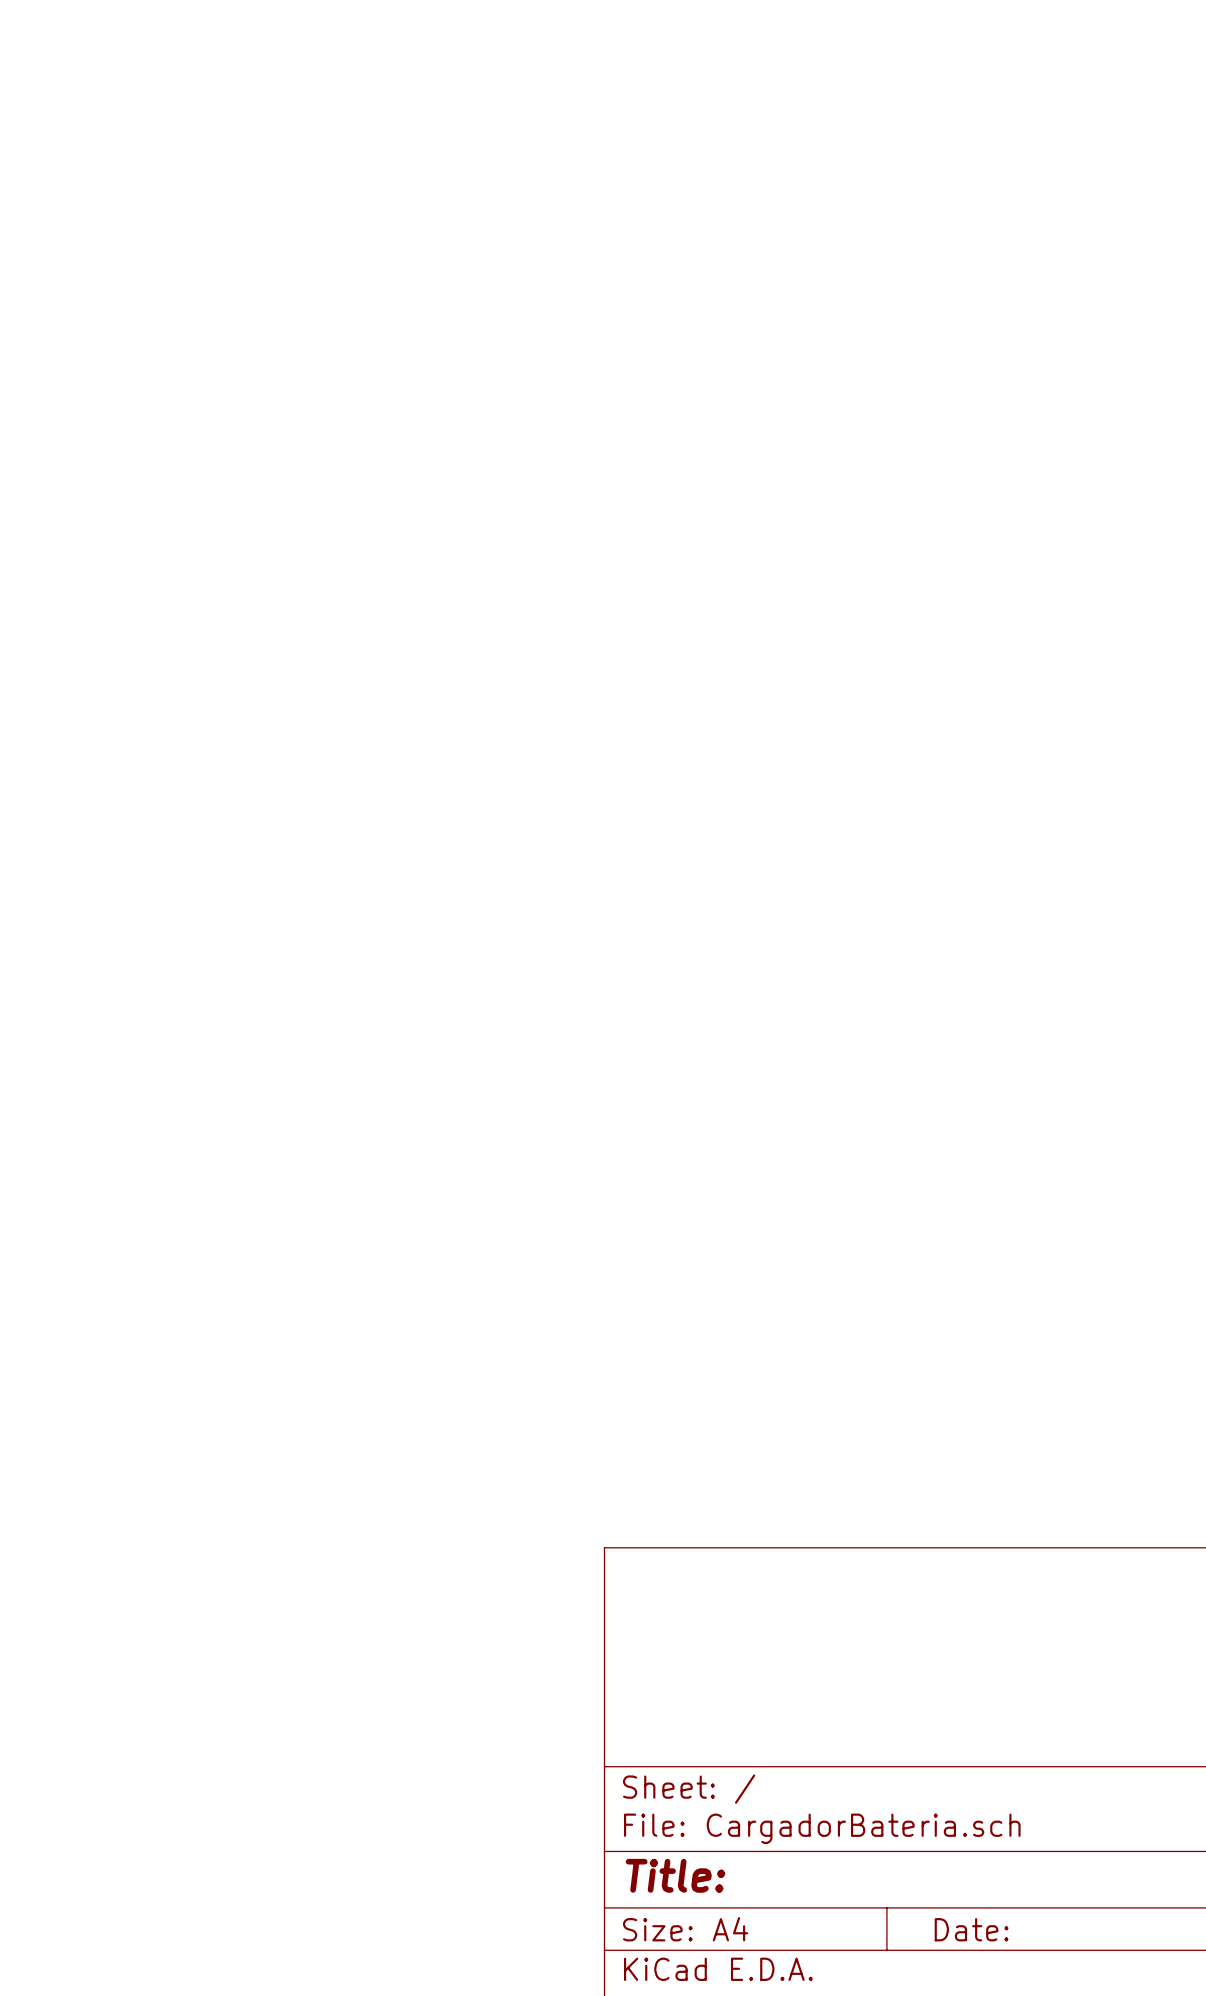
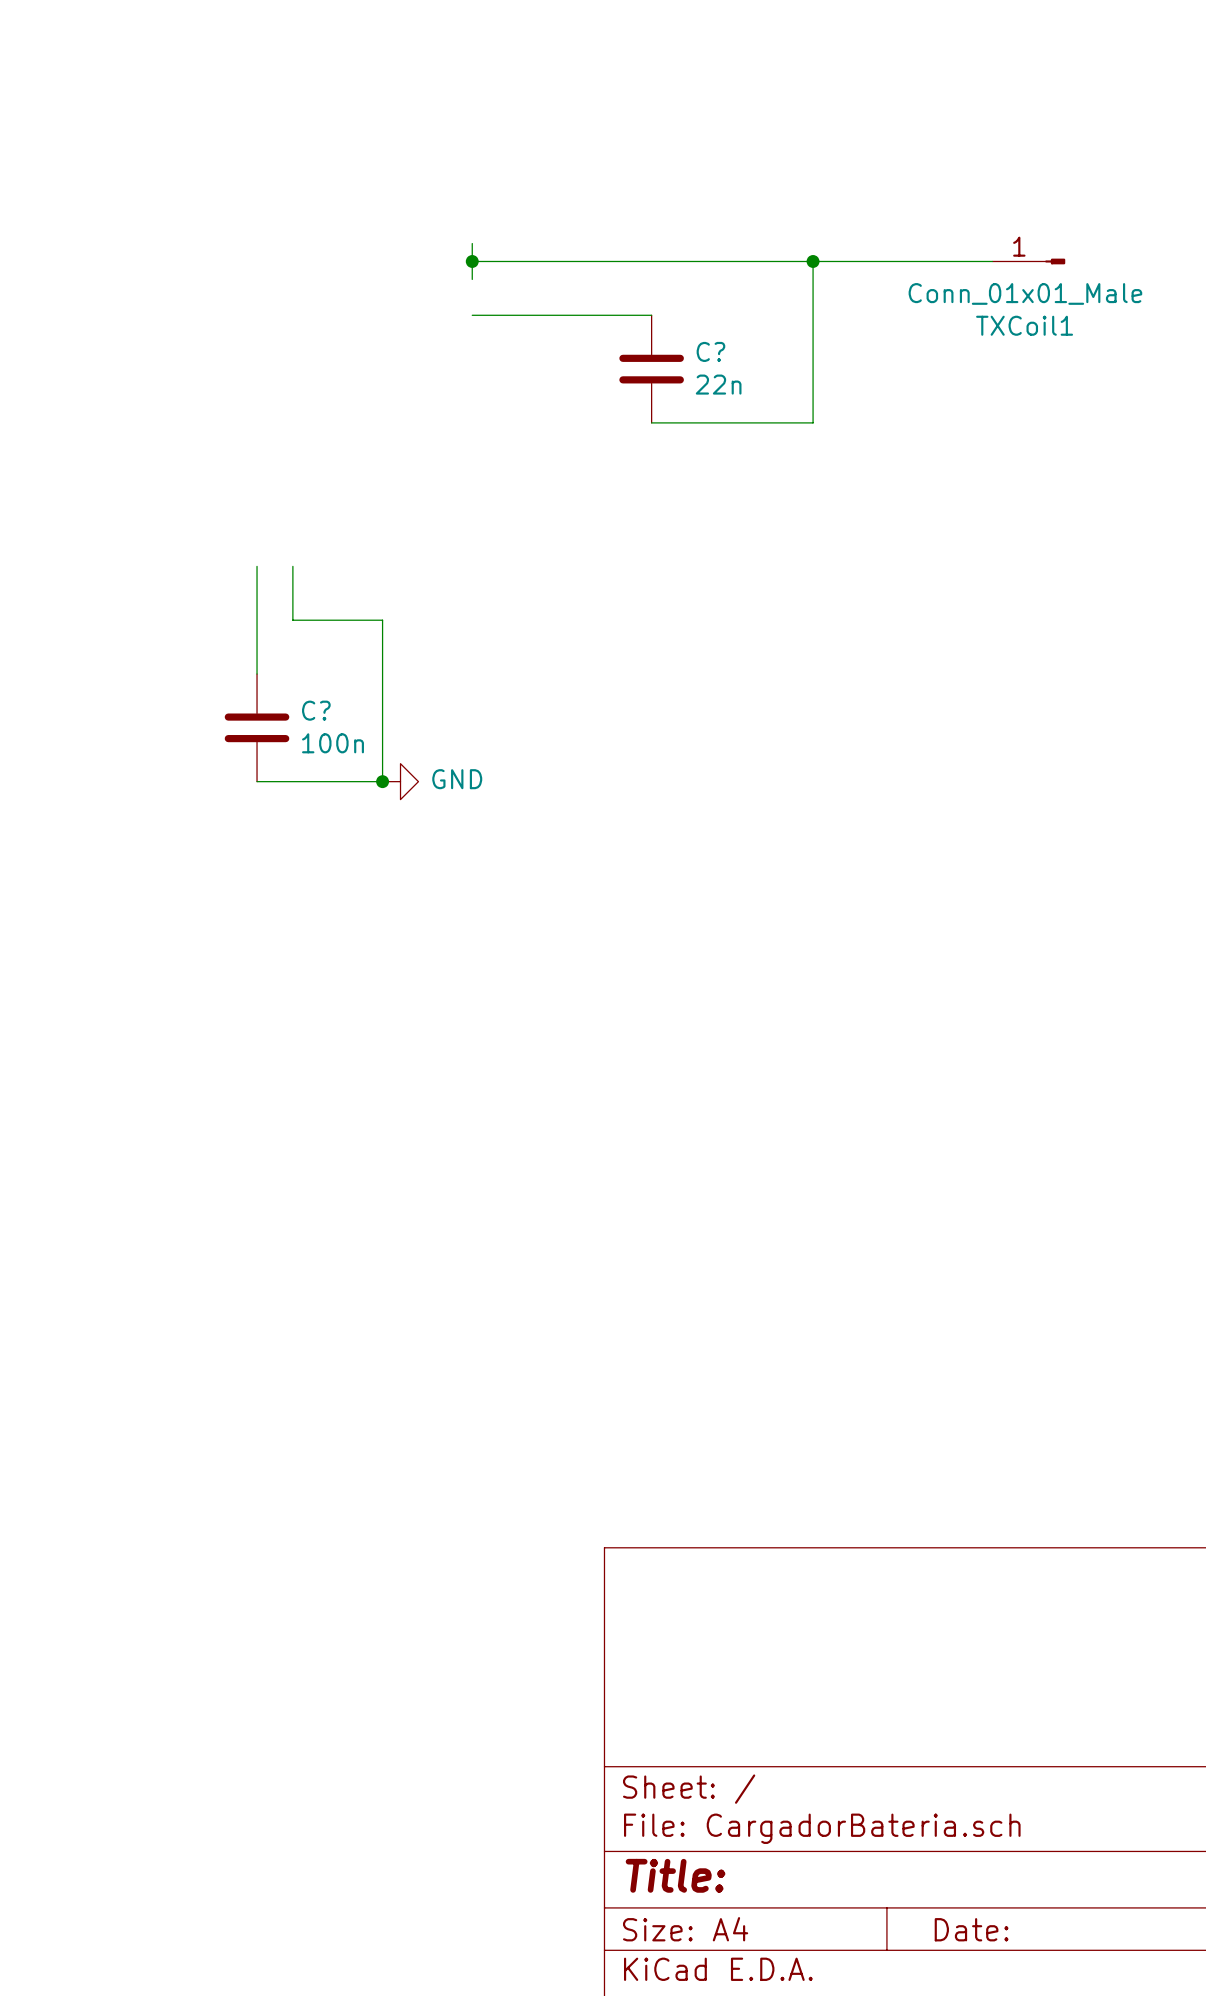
wire: none -> (472, 243) (472, 279)
wire: none -> (472, 261) (992, 261)
junction: none -> (472, 261)
wire: none -> (813, 261) (813, 422) (651, 422)
junction: none -> (813, 261)
TXCoil1: none -> Conn_01x01_Male (1028, 261)
wire: none -> (472, 315) (651, 315)
C?: none -> 22n (651, 369)
wire: none -> (257, 566) (257, 674)
wire: none -> (292, 566) (292, 620) (382, 620) (382, 781) (257, 781)
C?: none -> 100n (257, 727)
junction: none -> (382, 781)
power symbol: none -> GND (400, 781)

